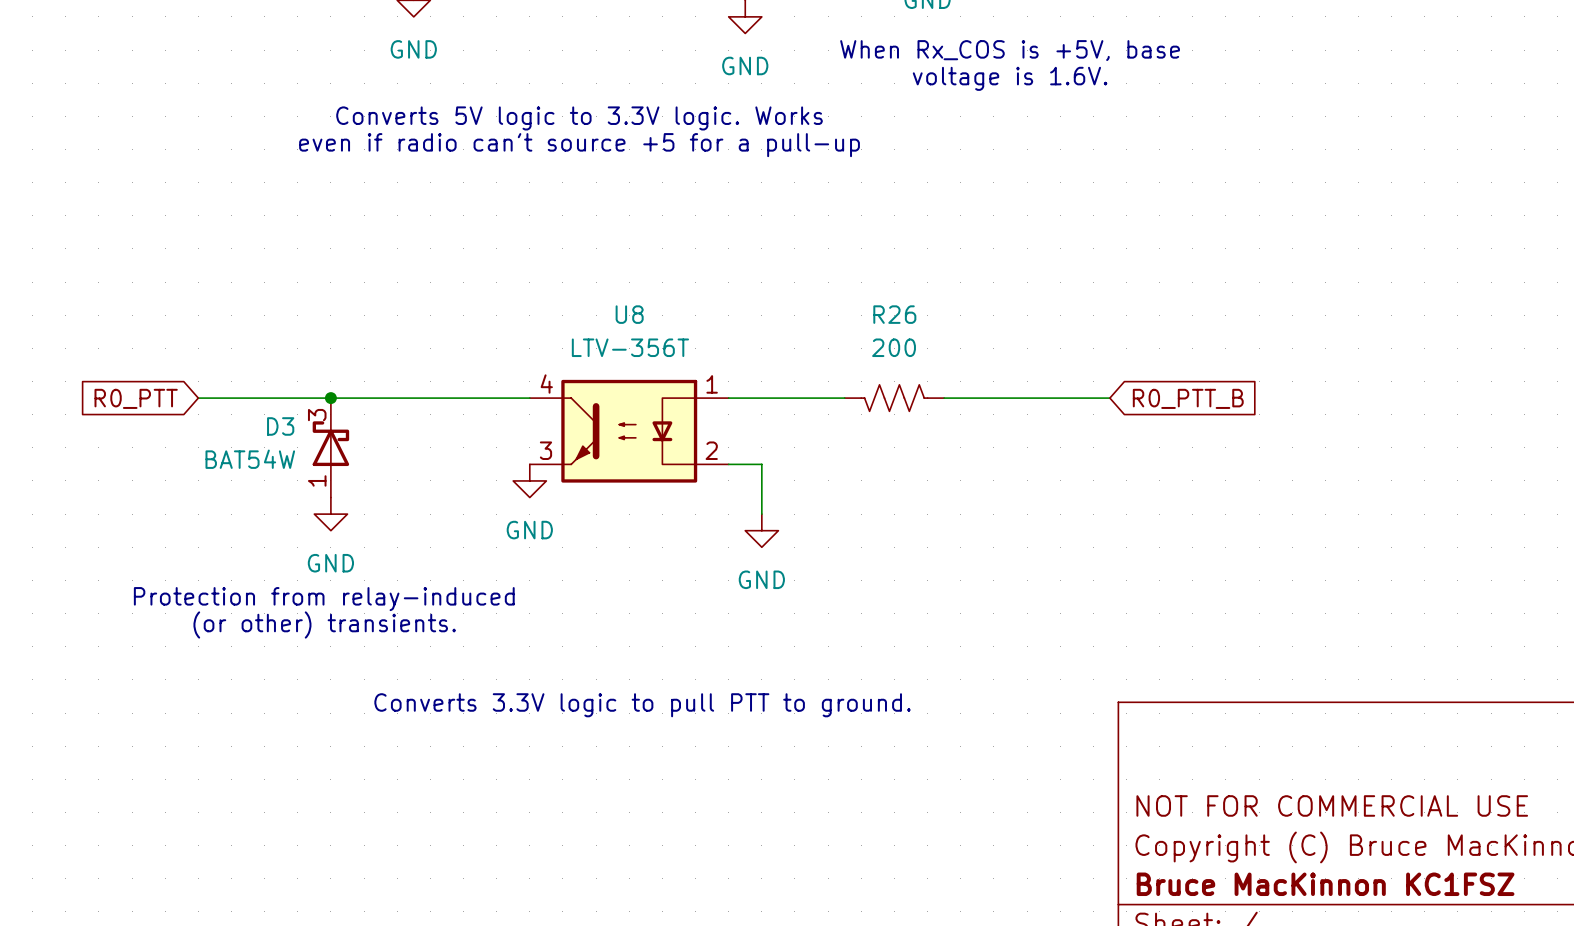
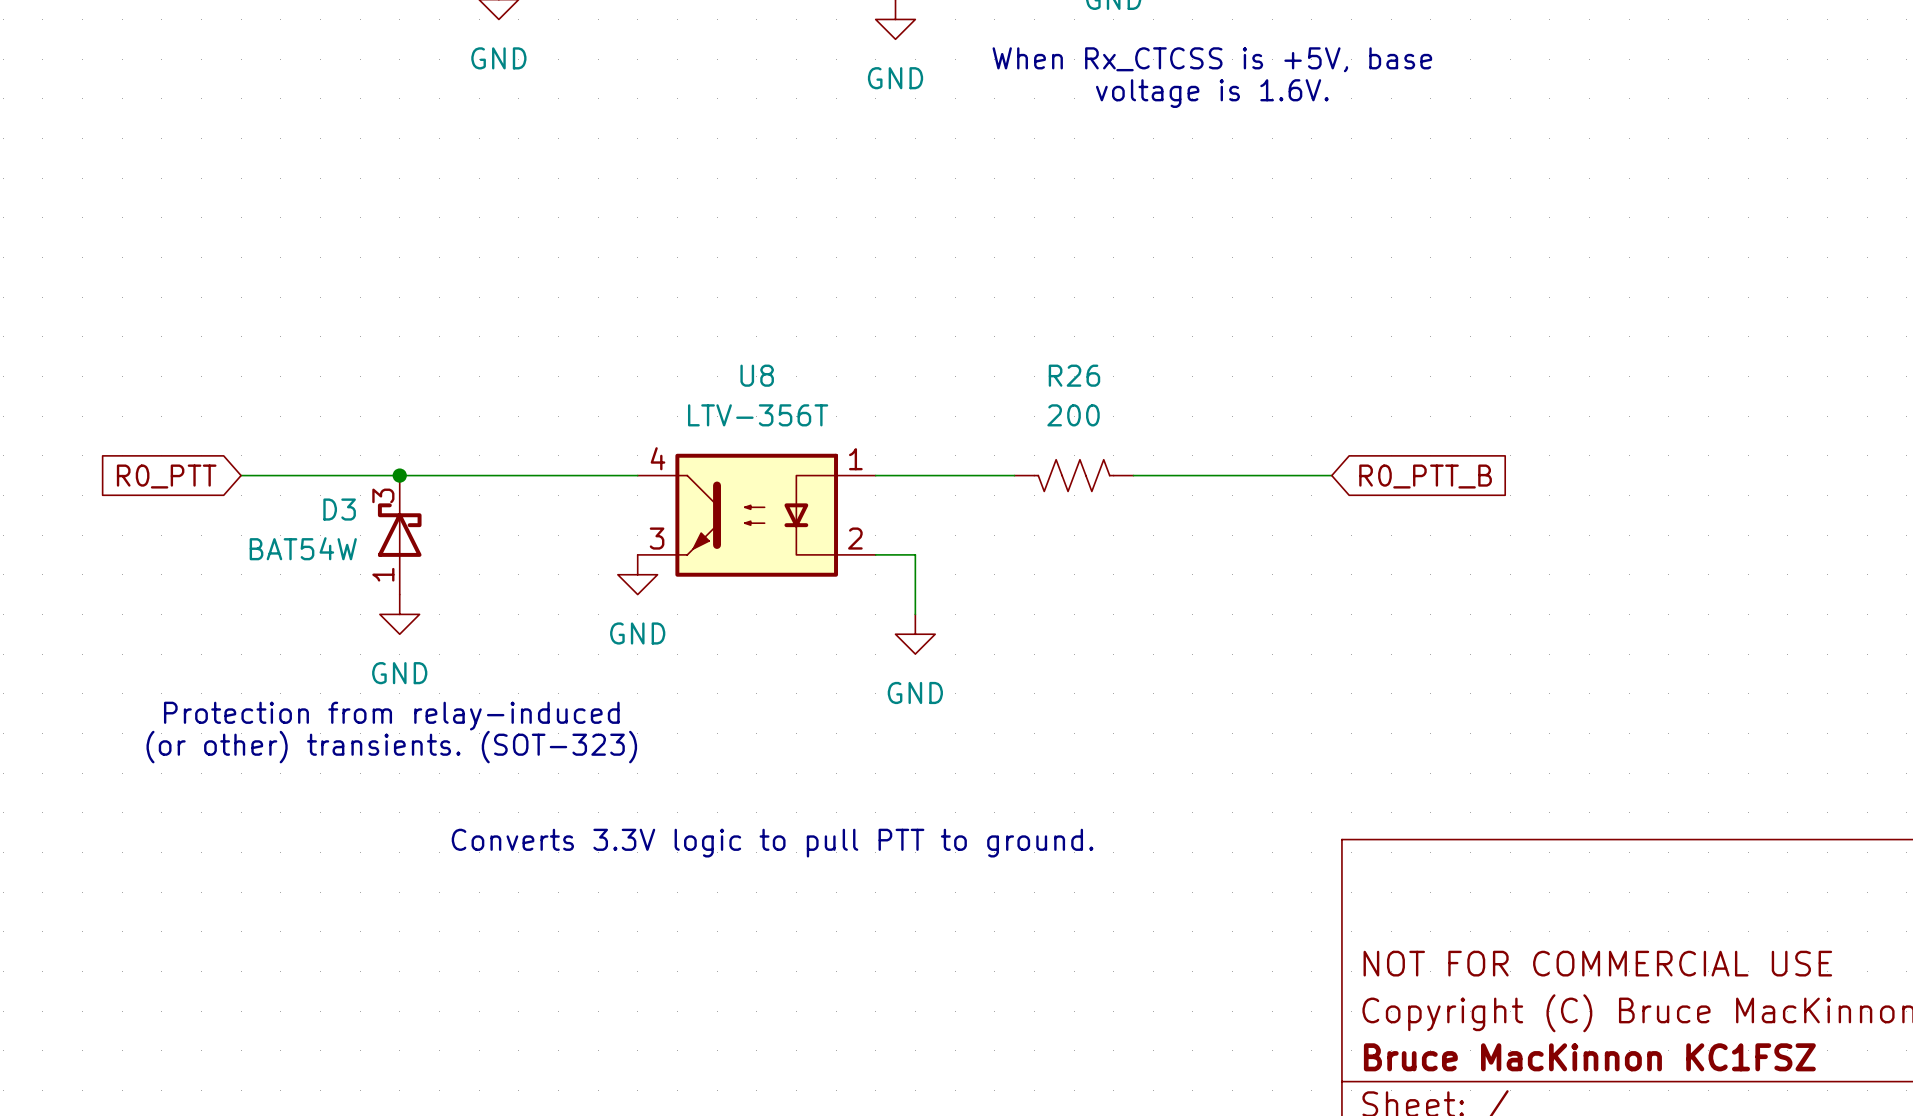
text: When Rx_COS is +5V, base (1010, 50) -> When Rx_CTCSS is +5V, base (1212, 59)
text: Converts 5V logic to 3.3V logic. Works (579, 118) -> none
text: even if radio can't source +5 for a pull-up (579, 145) -> none
text: (or other) transients. (324, 624) -> (or other) transients. (SOT-323) (391, 747)

